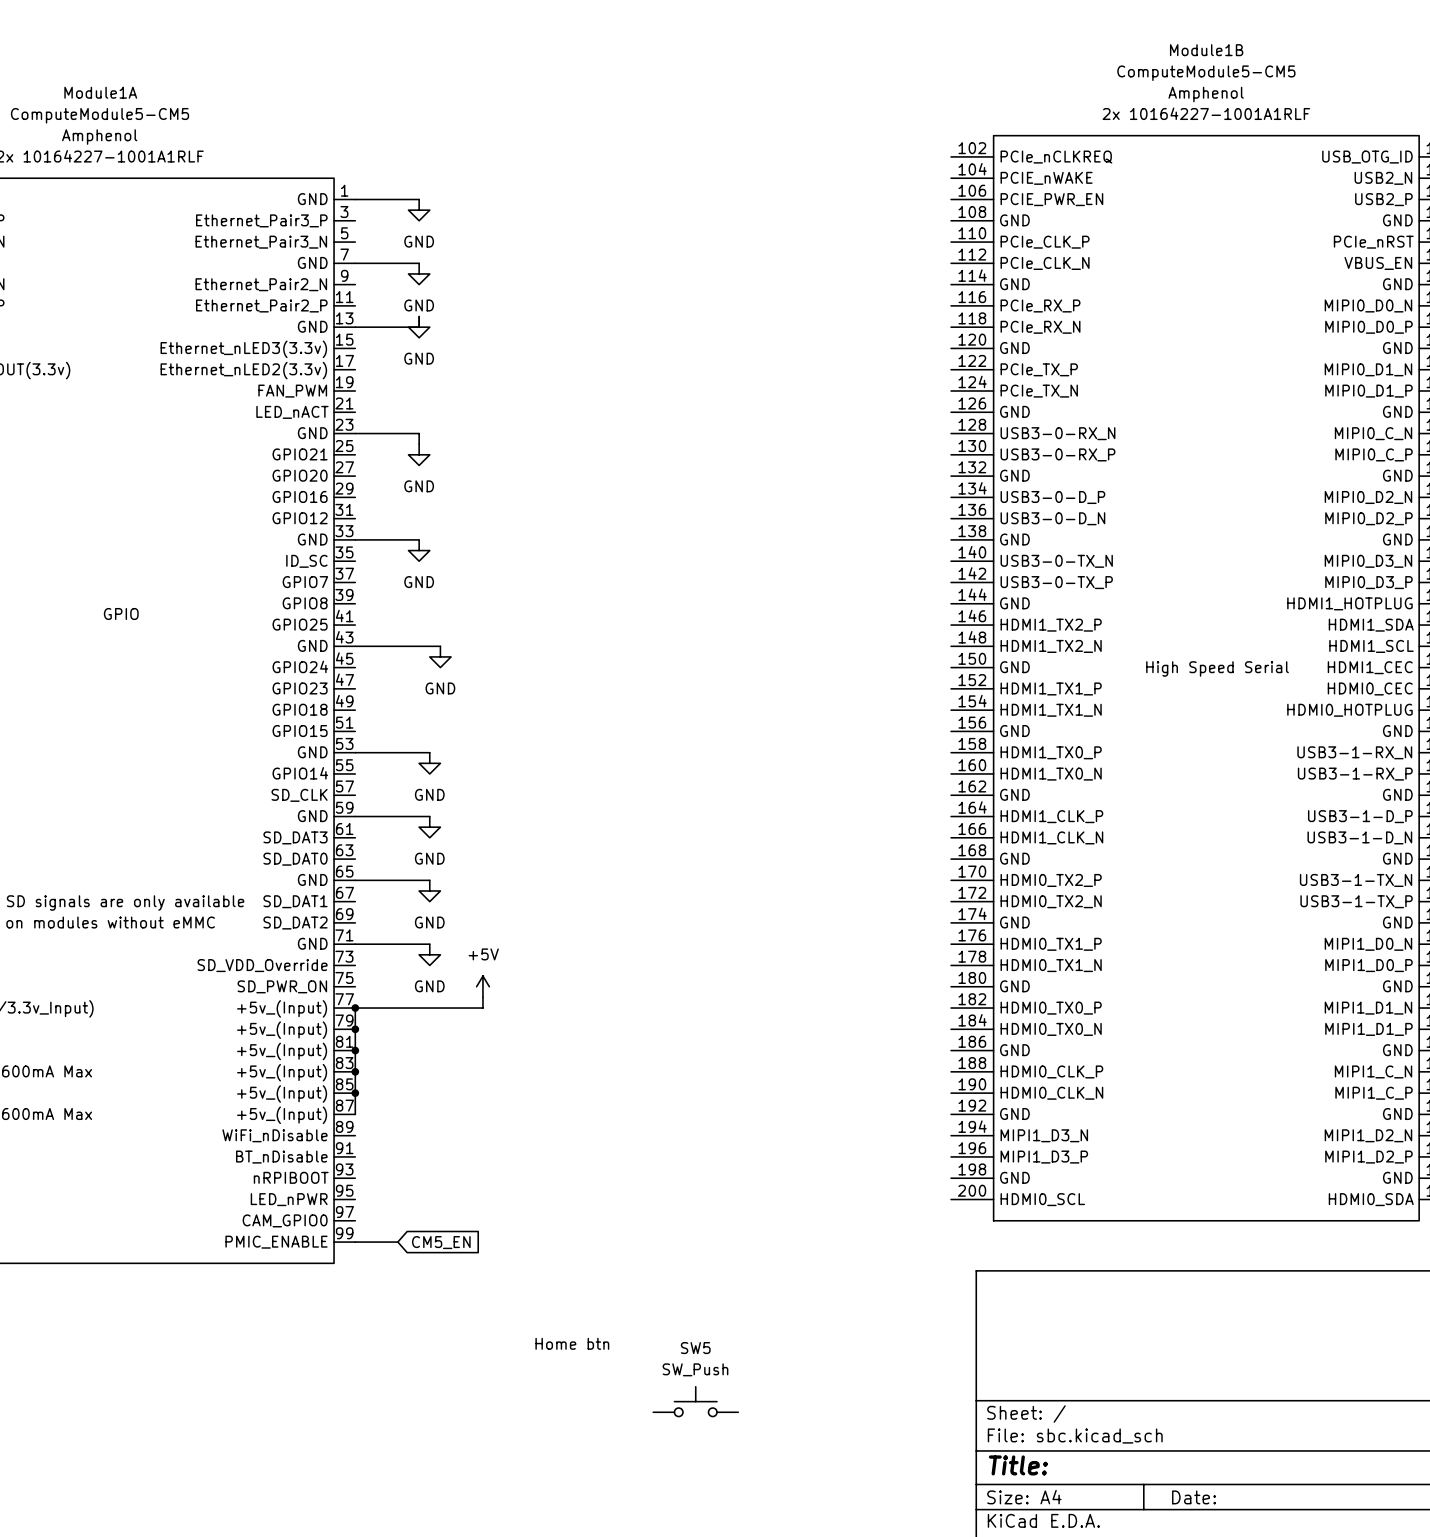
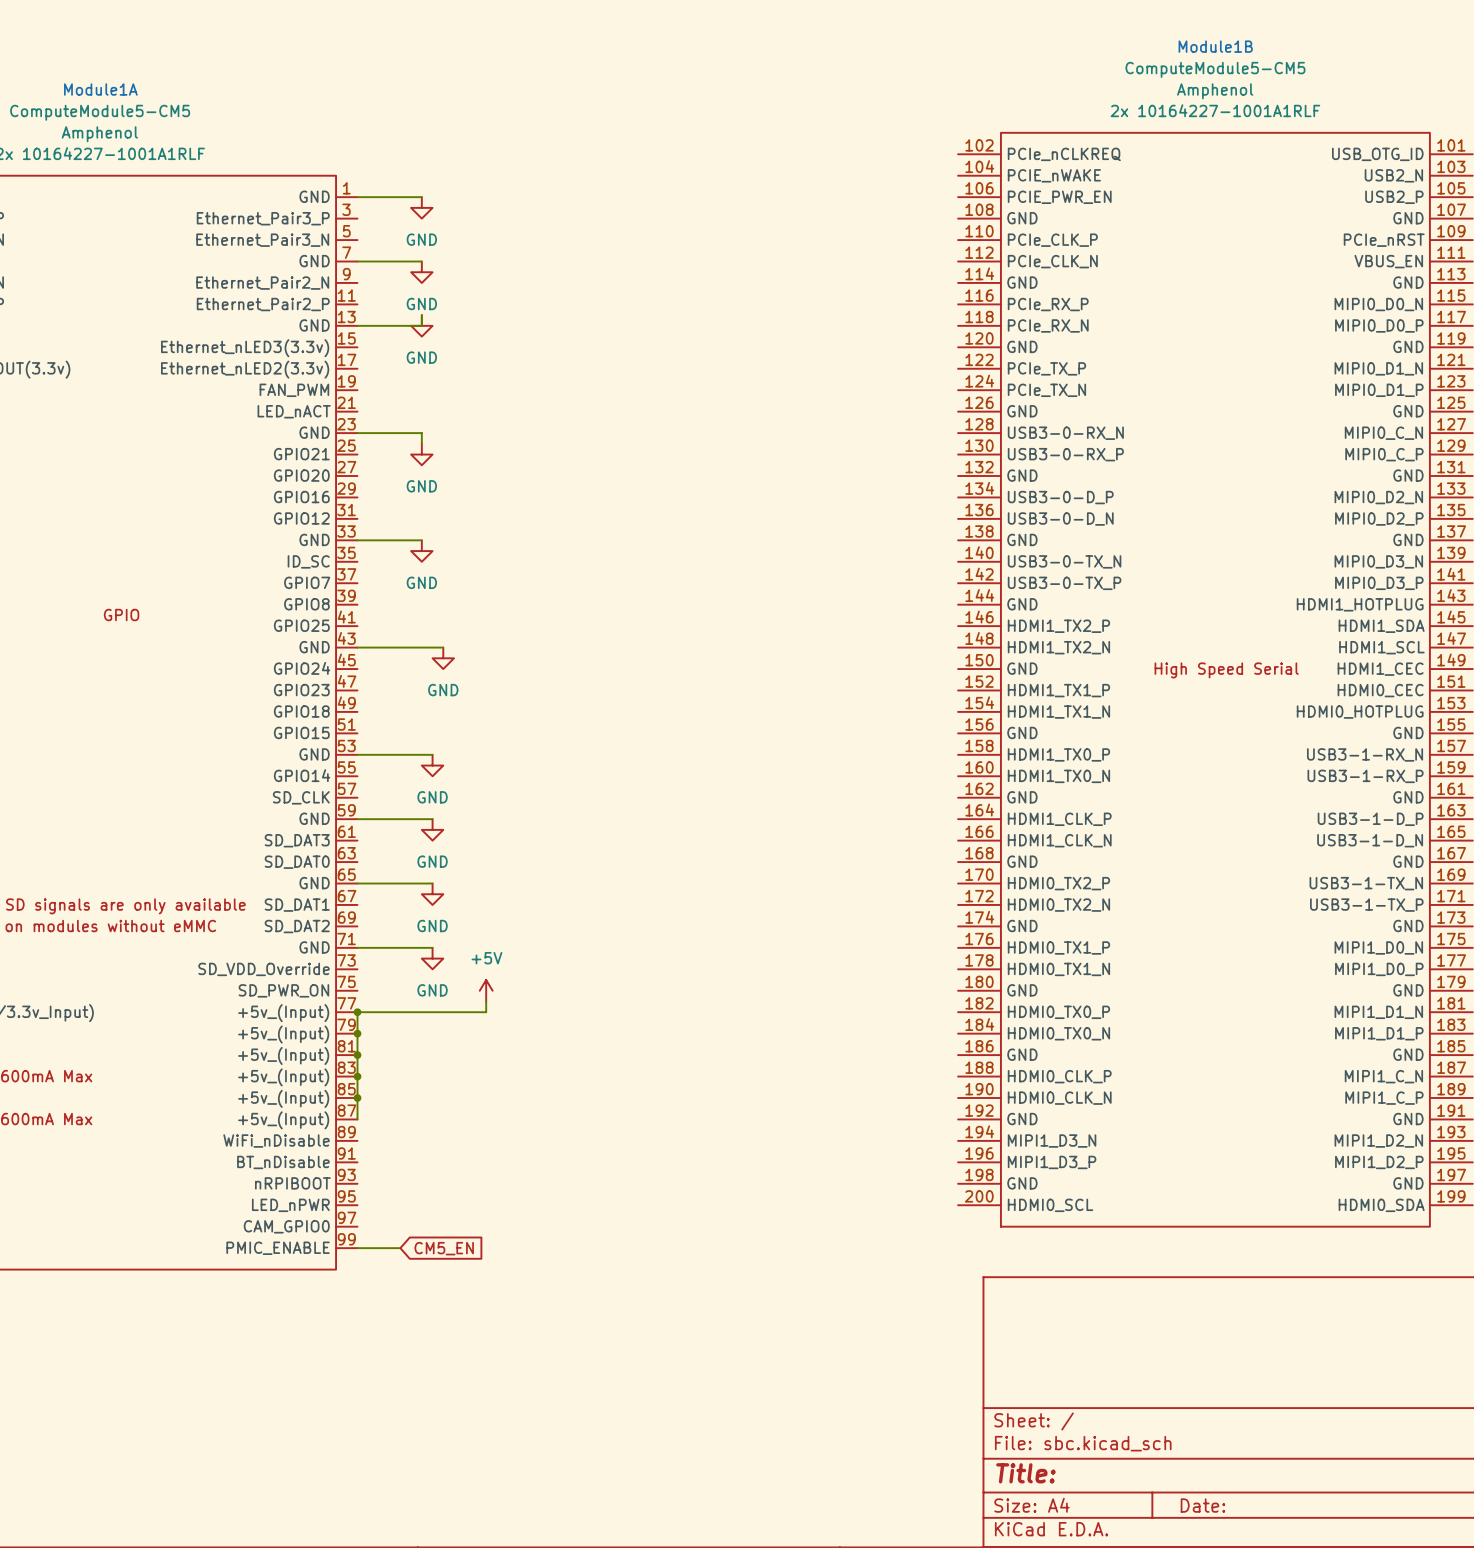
text: Home btn (572, 1343) -> none
SW5: SW_Push (695, 1401) -> none

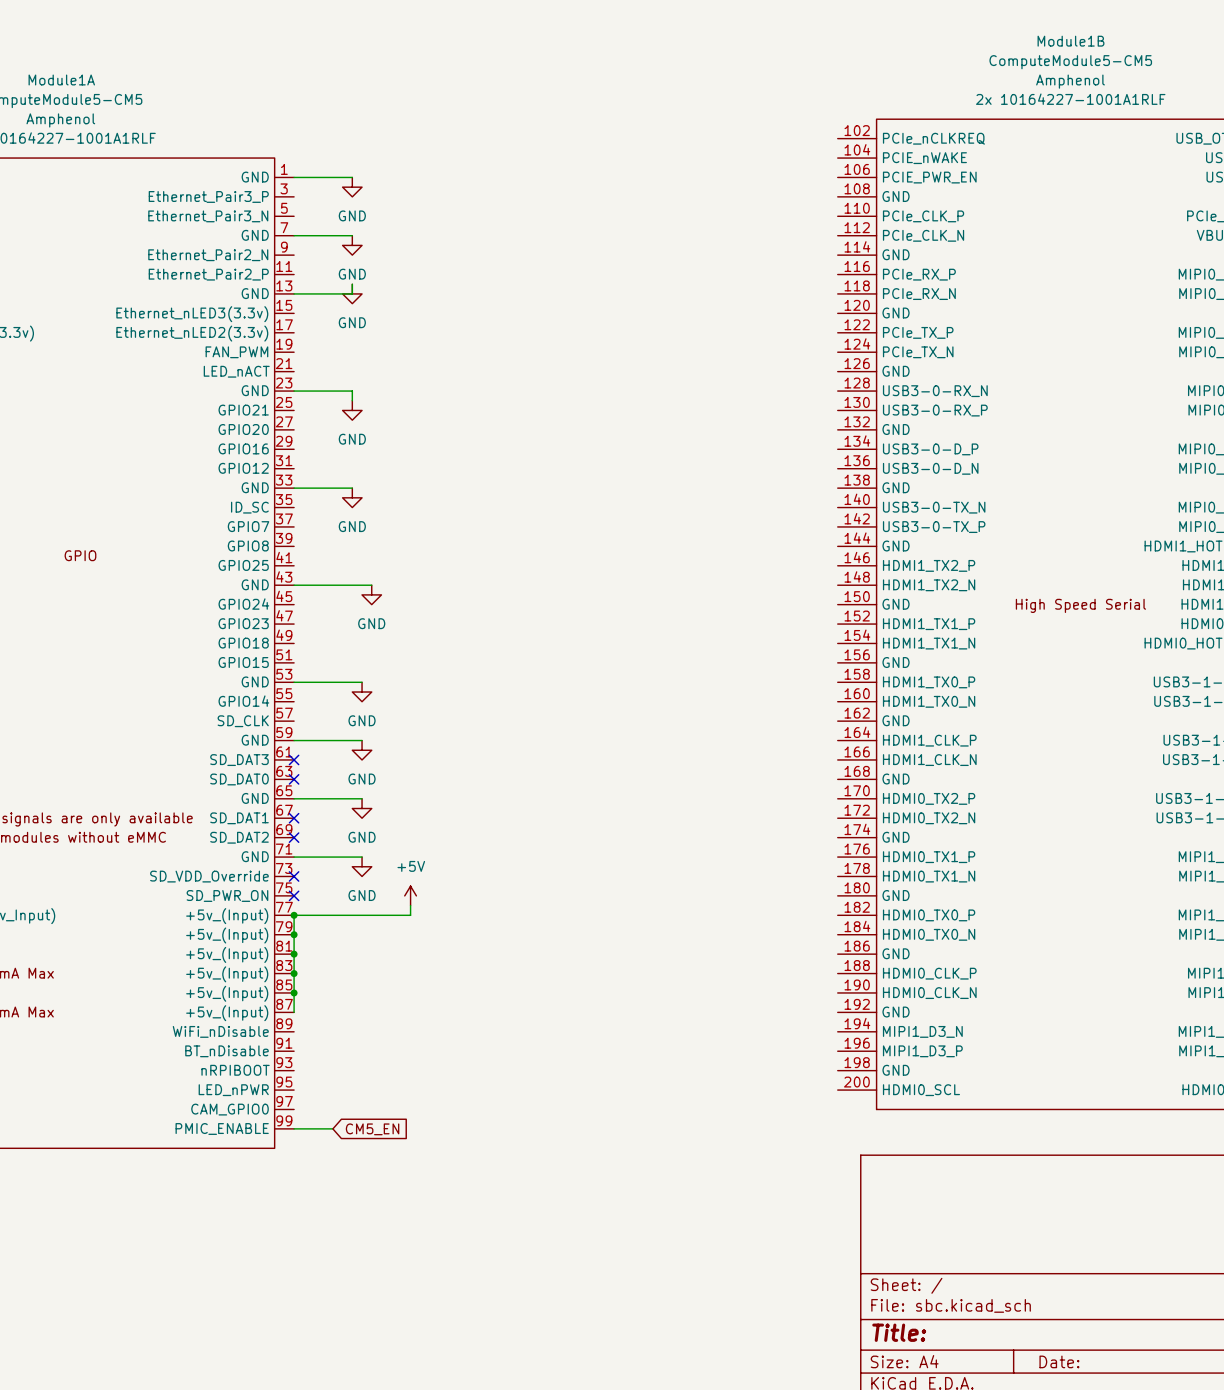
no-connect mark: none -> (294, 759)
no-connect mark: none -> (294, 779)
no-connect mark: none -> (294, 818)
no-connect mark: none -> (294, 837)
no-connect mark: none -> (294, 876)
no-connect mark: none -> (294, 895)

